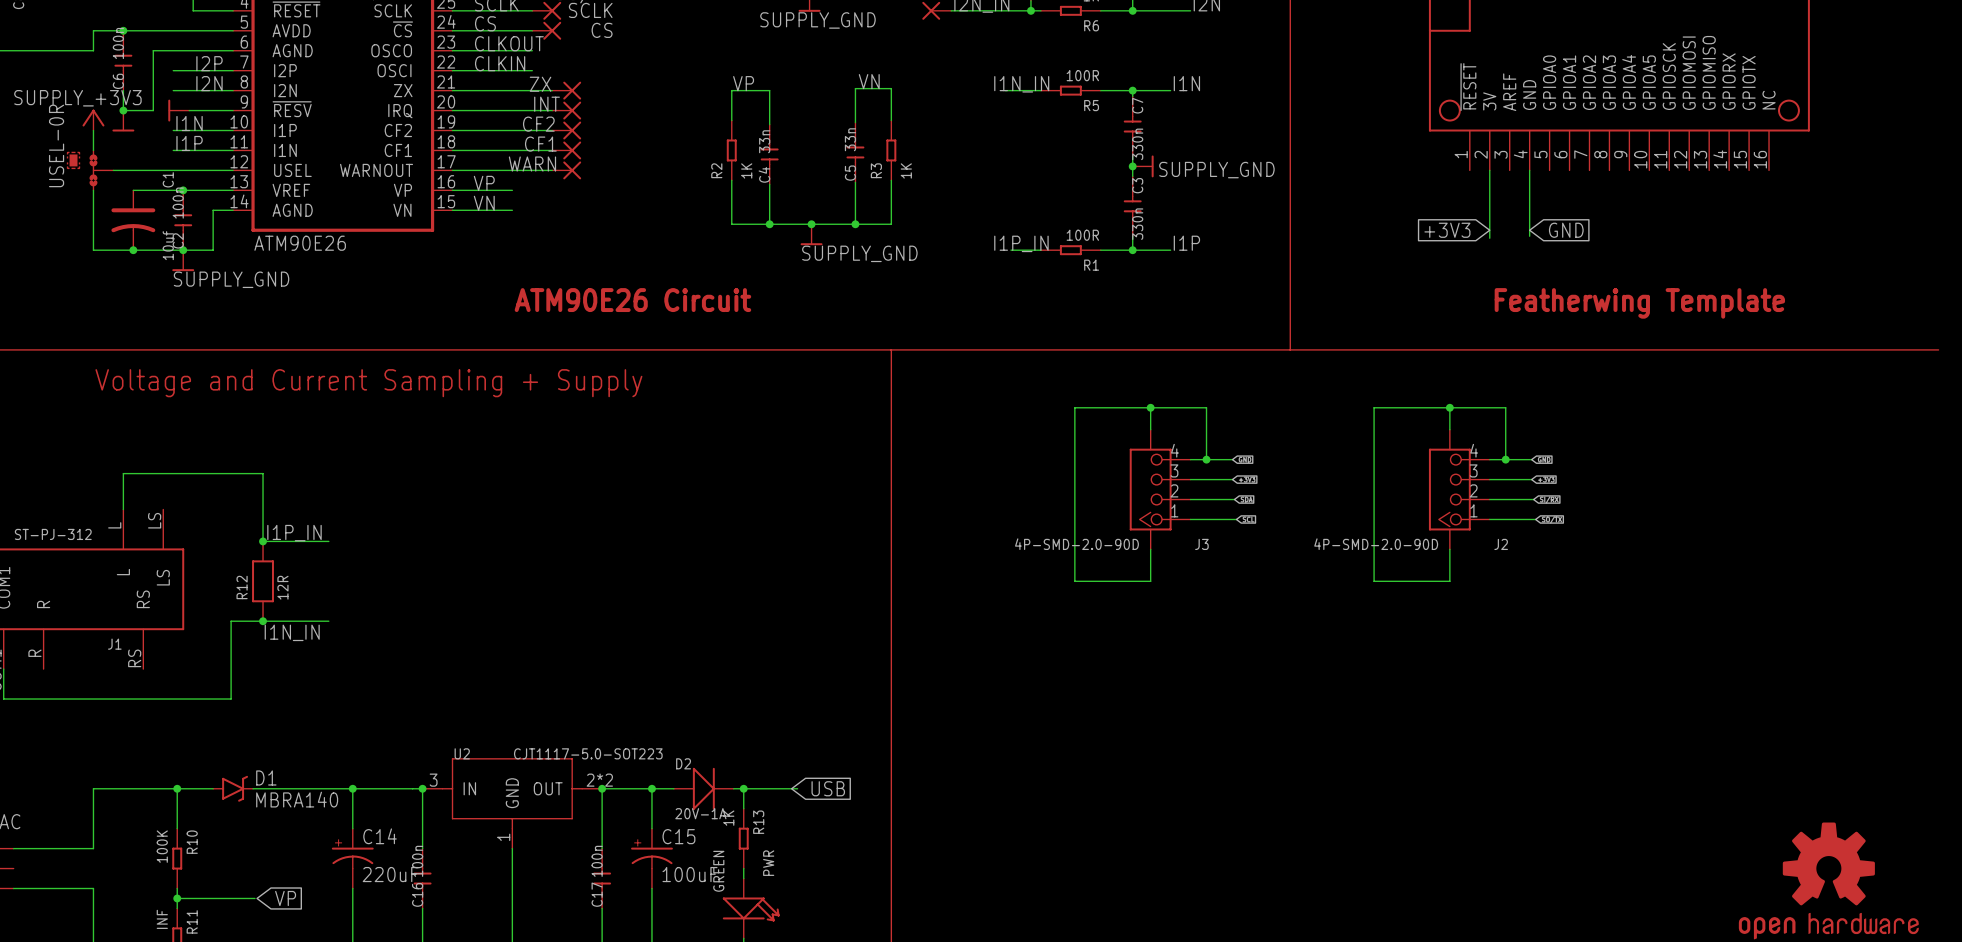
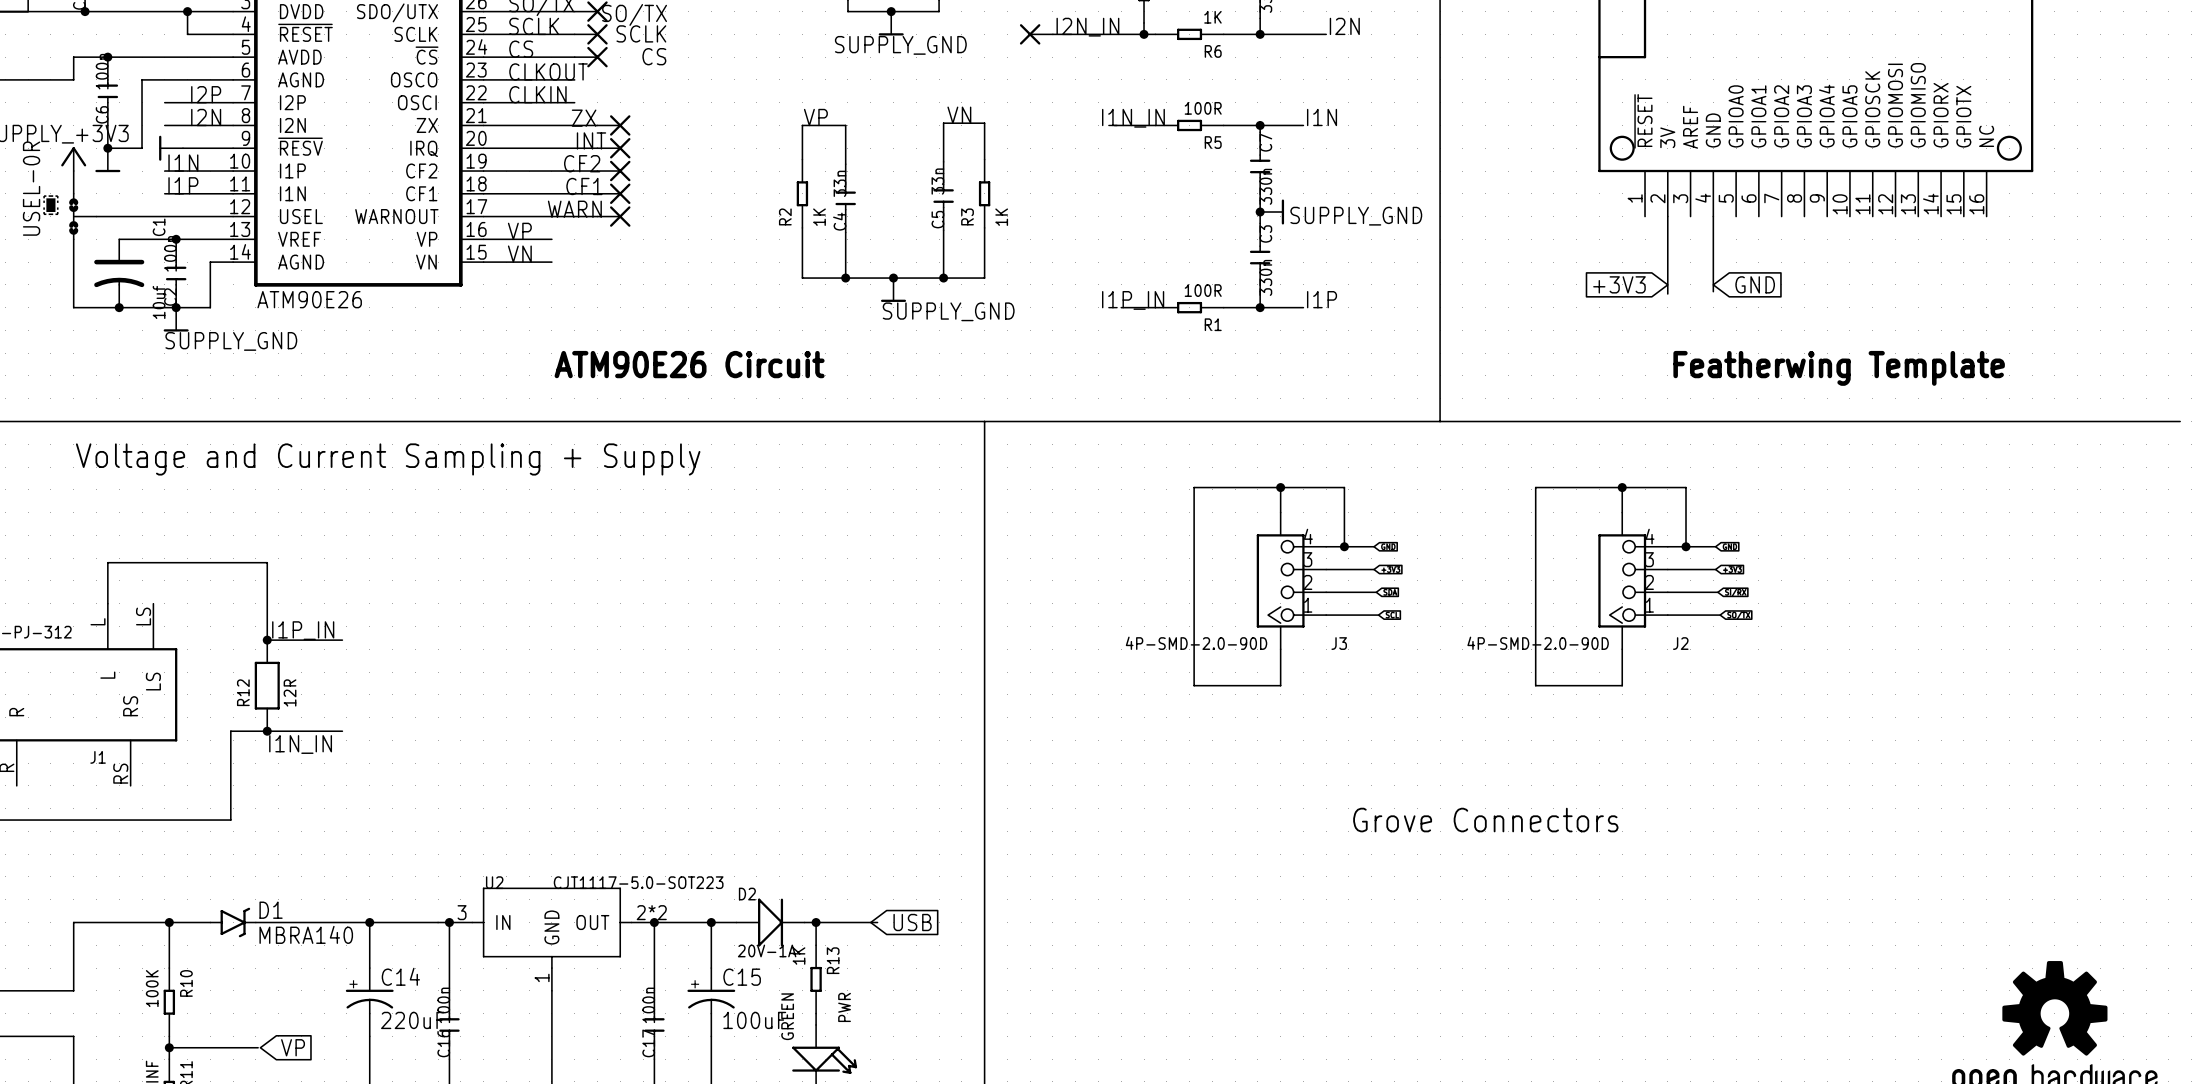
text: none -> Grove Connectors (1485, 820)

